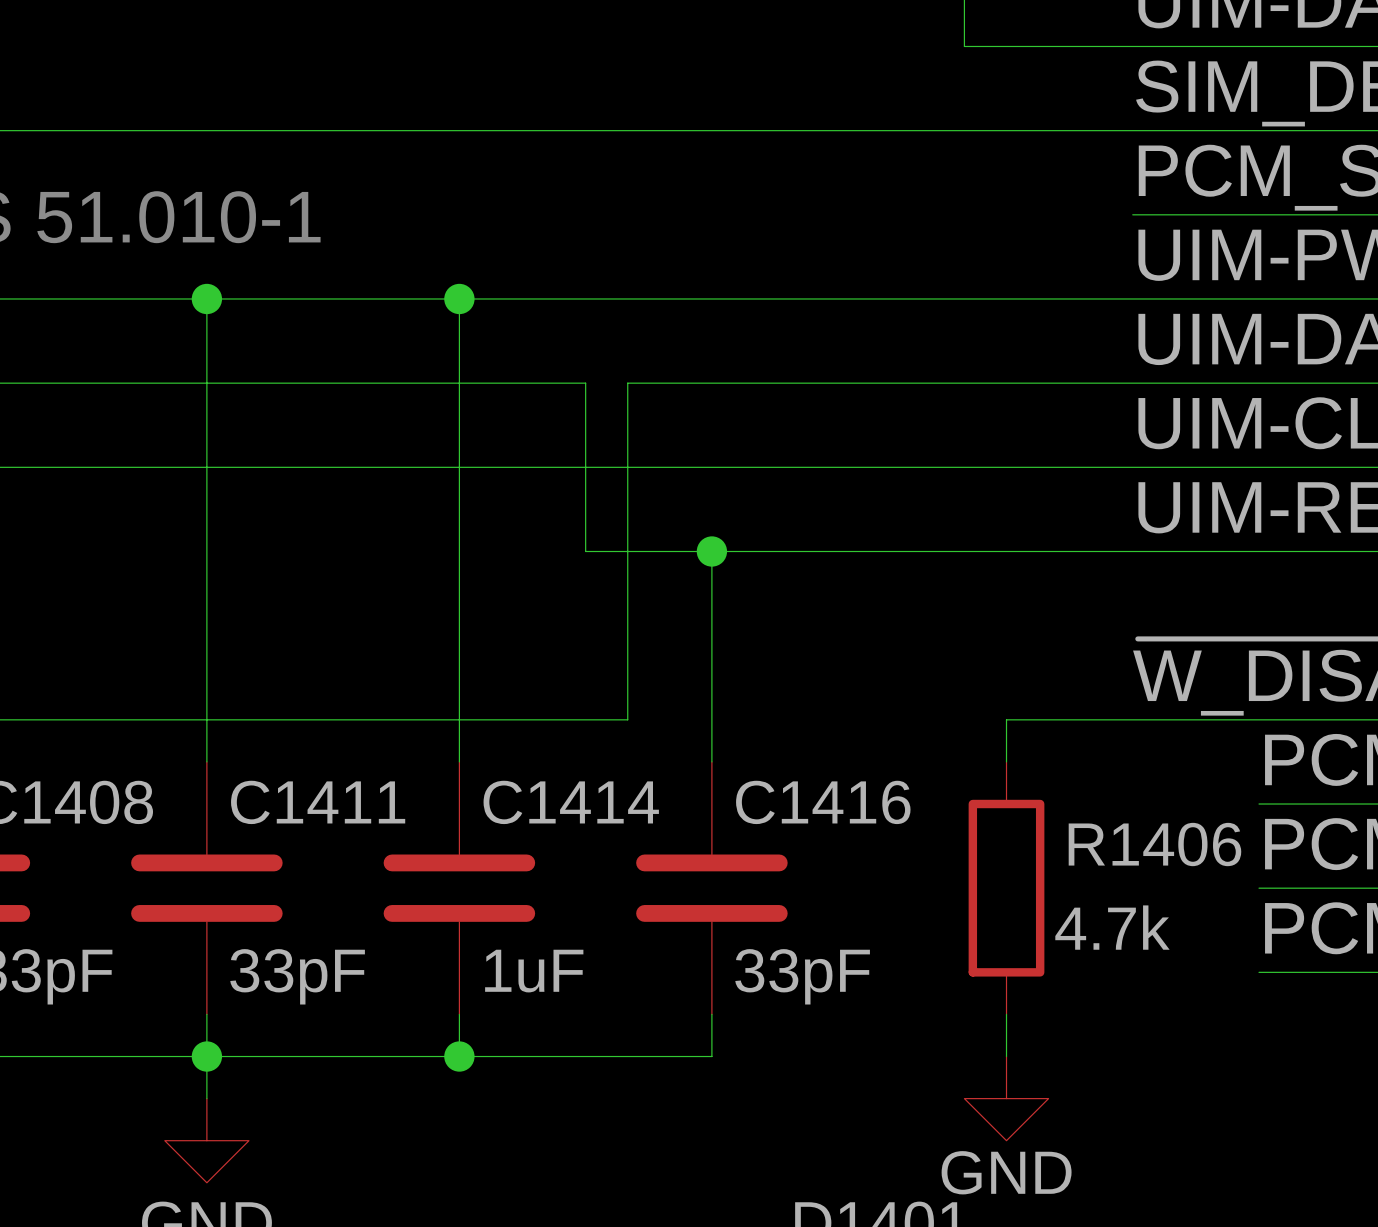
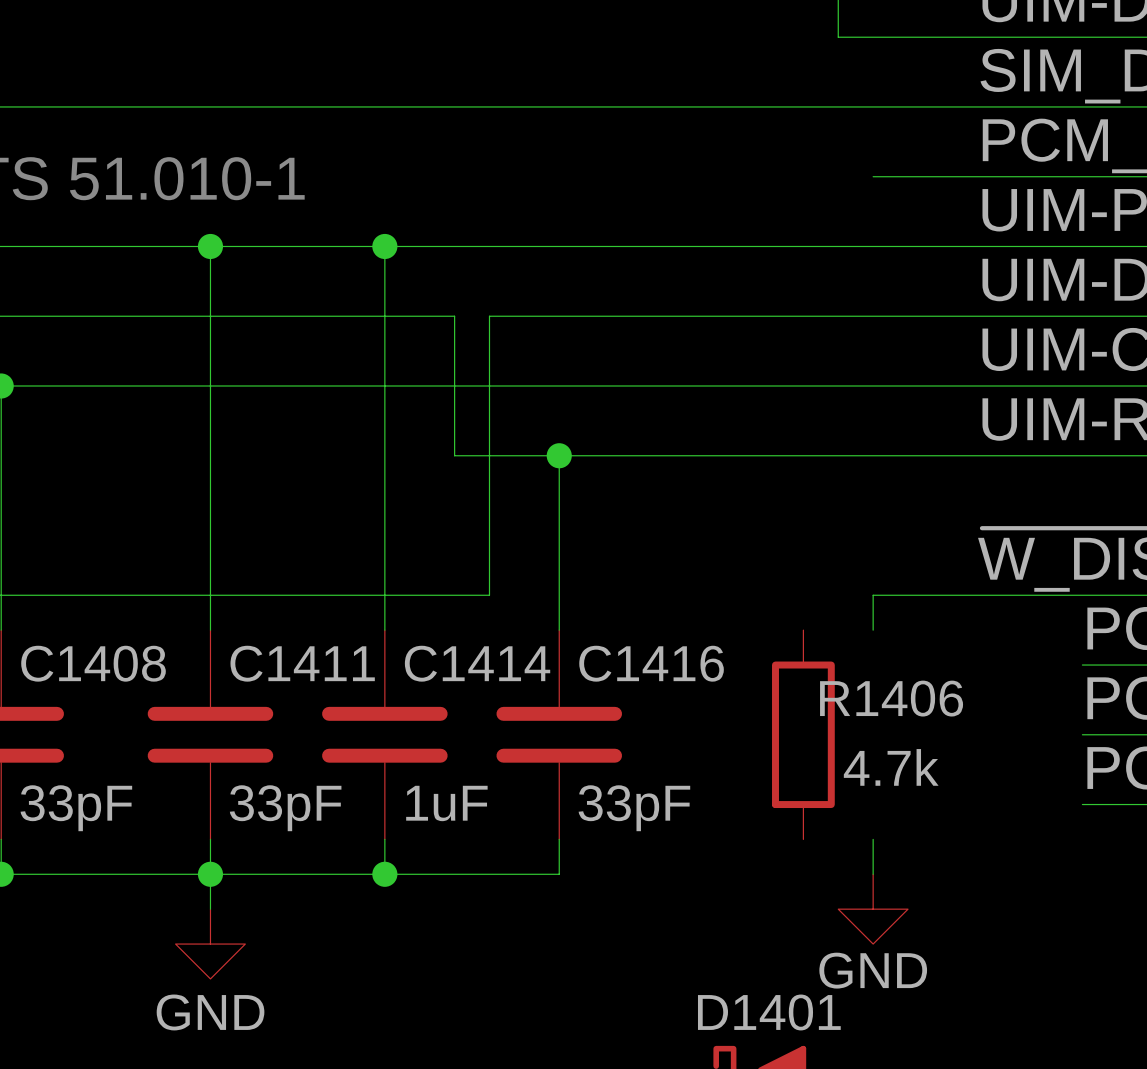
wire: none -> (873, 176) (977, 176)
wire: (459, 298) (459, 761) -> (384, 246) (384, 630)
junction position: (459, 298) -> (384, 246)
wire: (501, 383) (543, 383) -> (489, 595) (489, 316)
wire: (585, 383) (585, 551) -> (454, 316) (454, 455) (524, 455)
wire: (627, 383) (627, 551) -> (559, 316) (524, 316)
wire: (711, 551) (711, 761) -> none
junction position: (711, 551) -> (559, 455)
wire: (543, 719) (627, 719) -> (559, 630) (559, 595)
R1406 name position: R1406 (1154, 844) -> R1406 (891, 698)
C1414 position: (459, 888) -> (384, 734)
C1416 position: (711, 888) -> (559, 734)
R1406 position: (1006, 888) -> (803, 734)
wire: (459, 1014) (459, 1056) -> (384, 839) (384, 874)
wire: (711, 1014) (711, 1056) (627, 1056) -> (559, 839) (559, 874)
junction position: (459, 1056) -> (384, 874)

